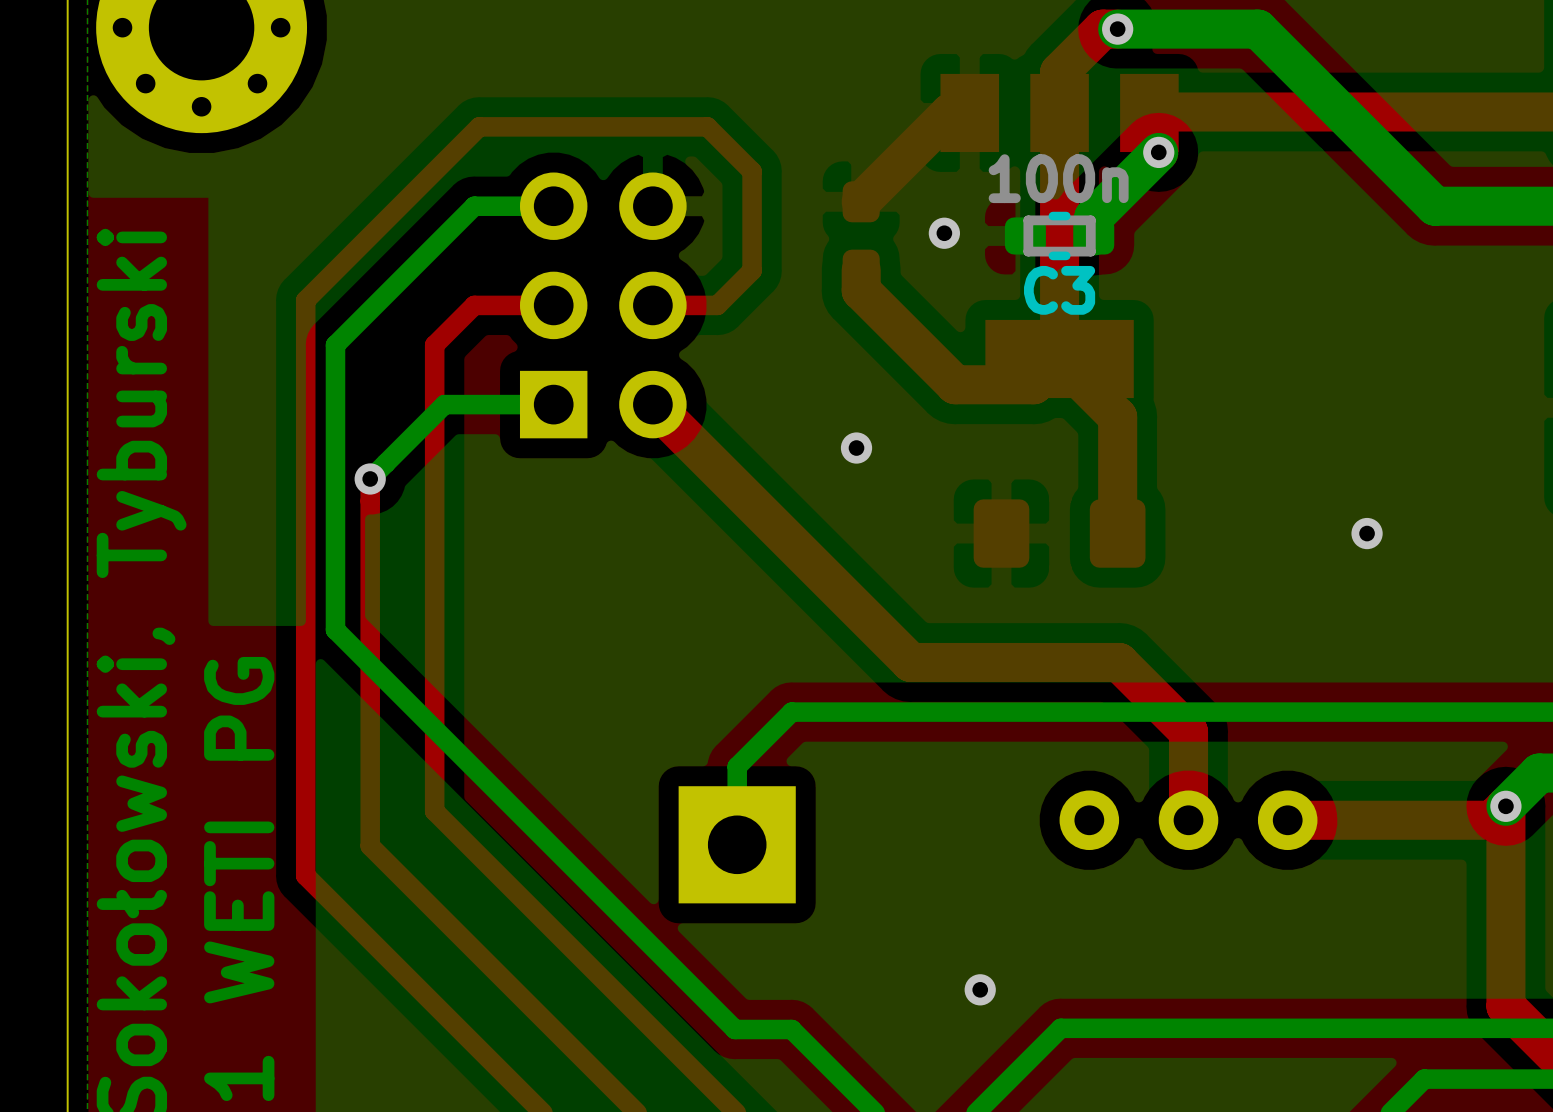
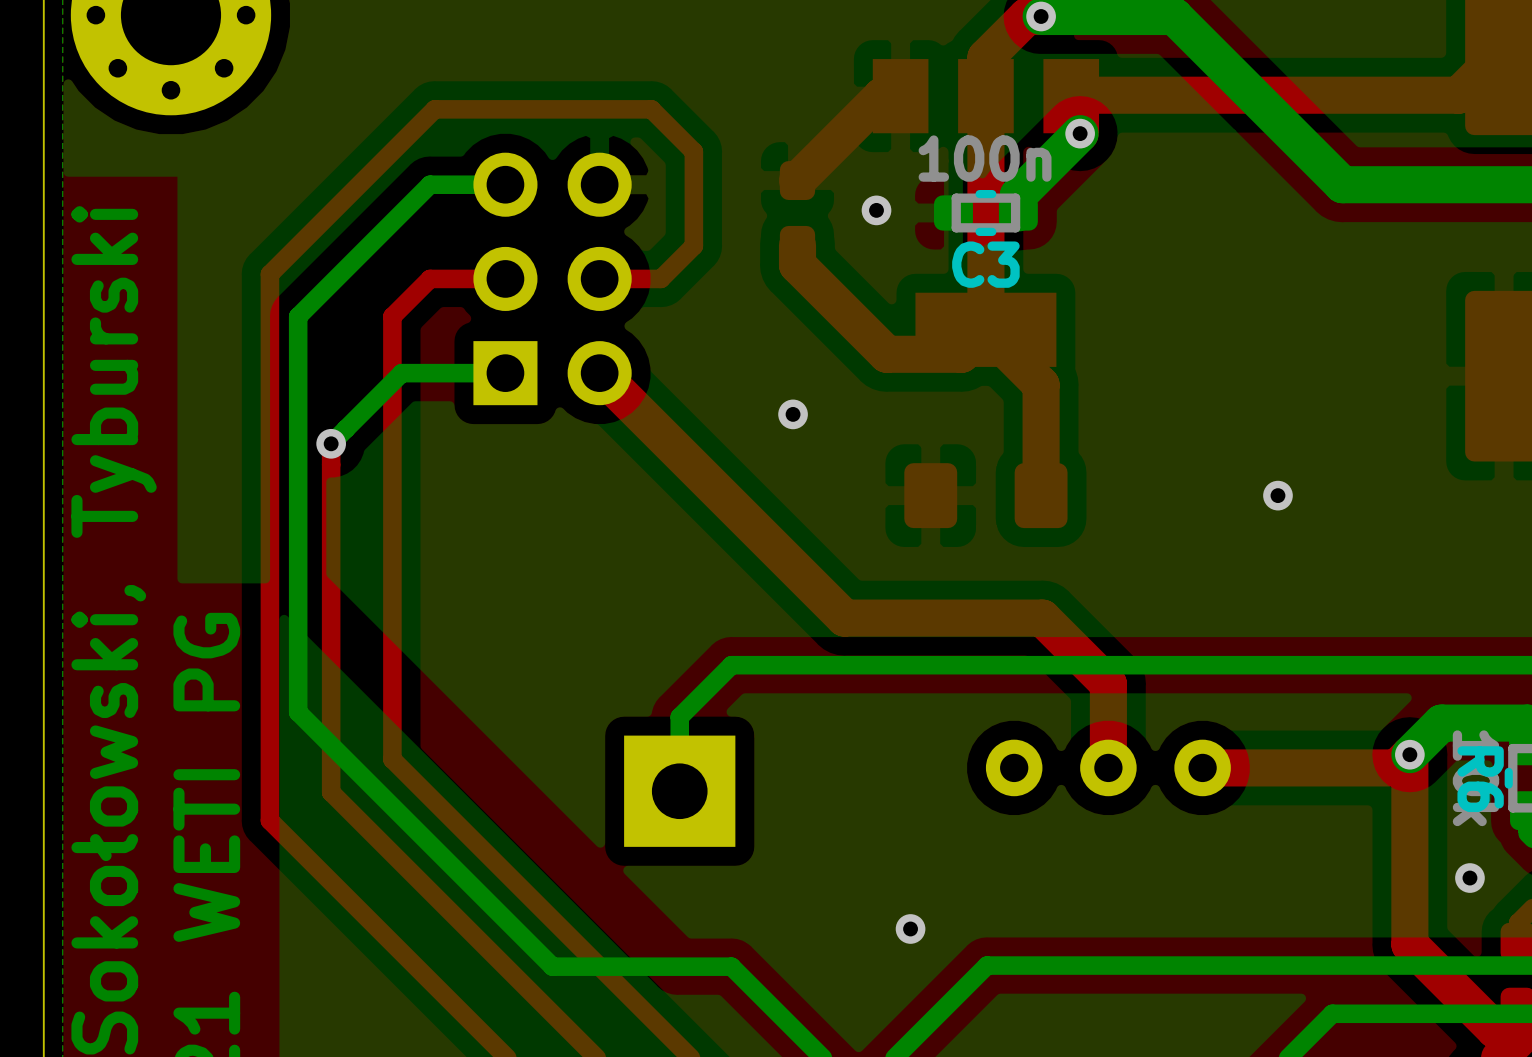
bottom track: (335, 629) (735, 1029) -> (298, 587) (298, 712) (552, 966) (677, 966)

